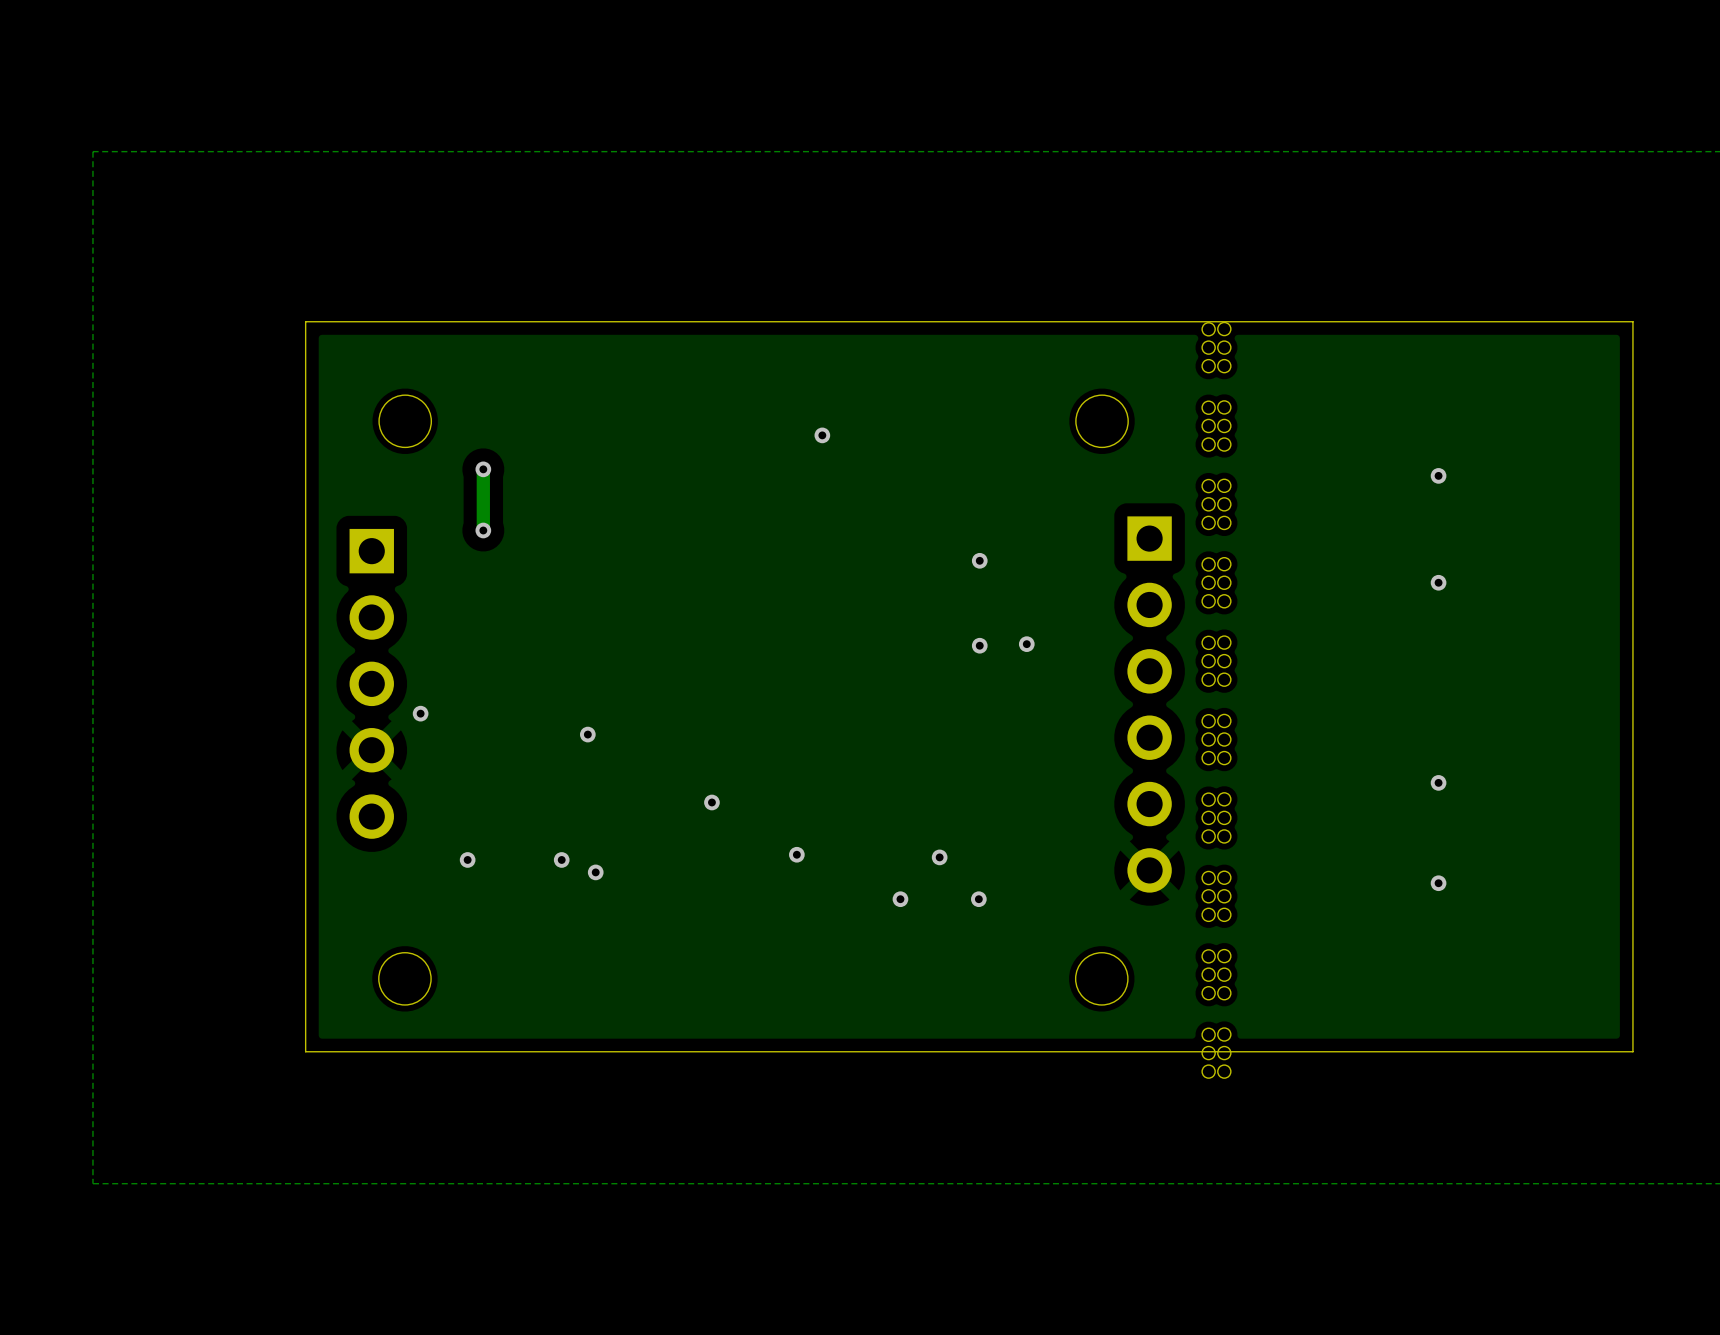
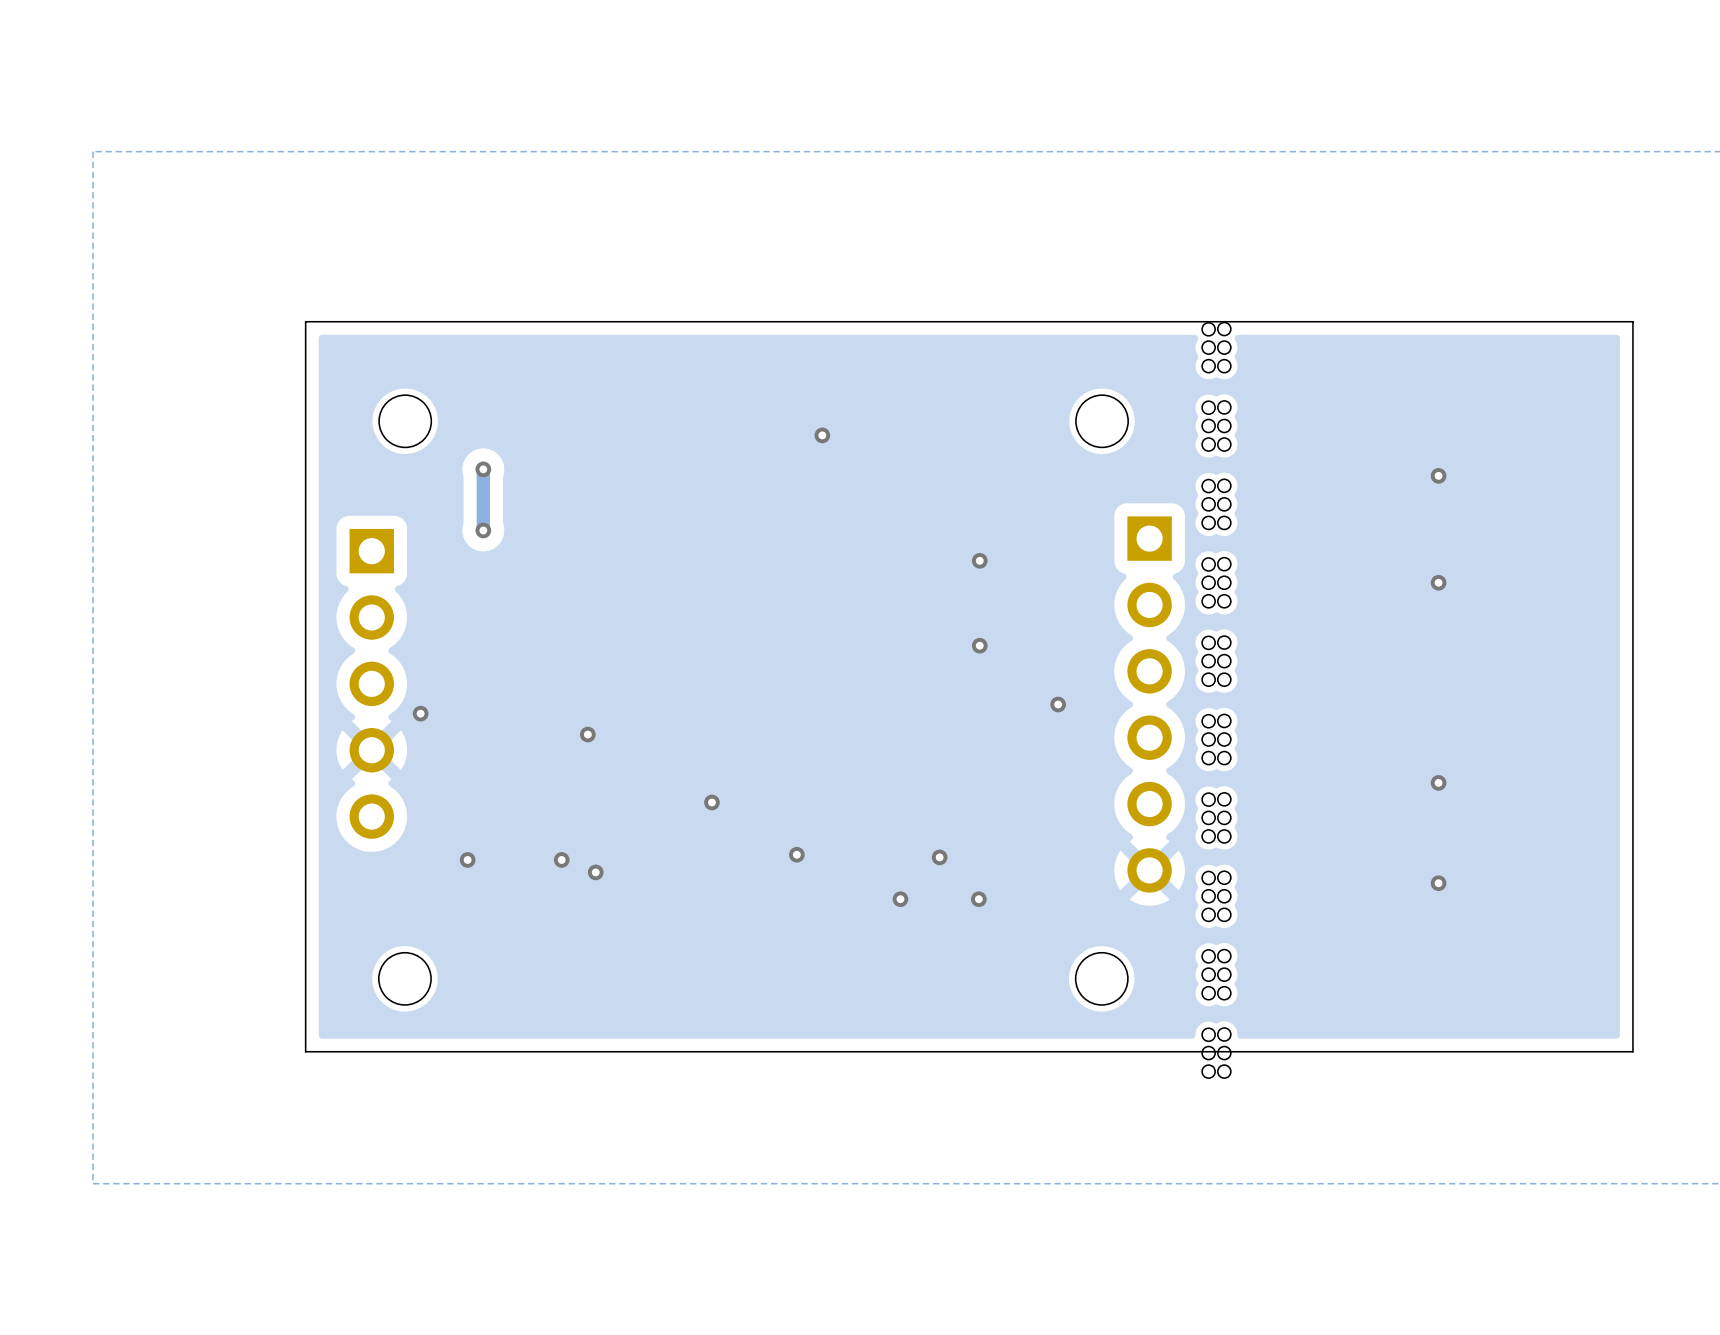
via position: (1026, 644) -> (1058, 704)

